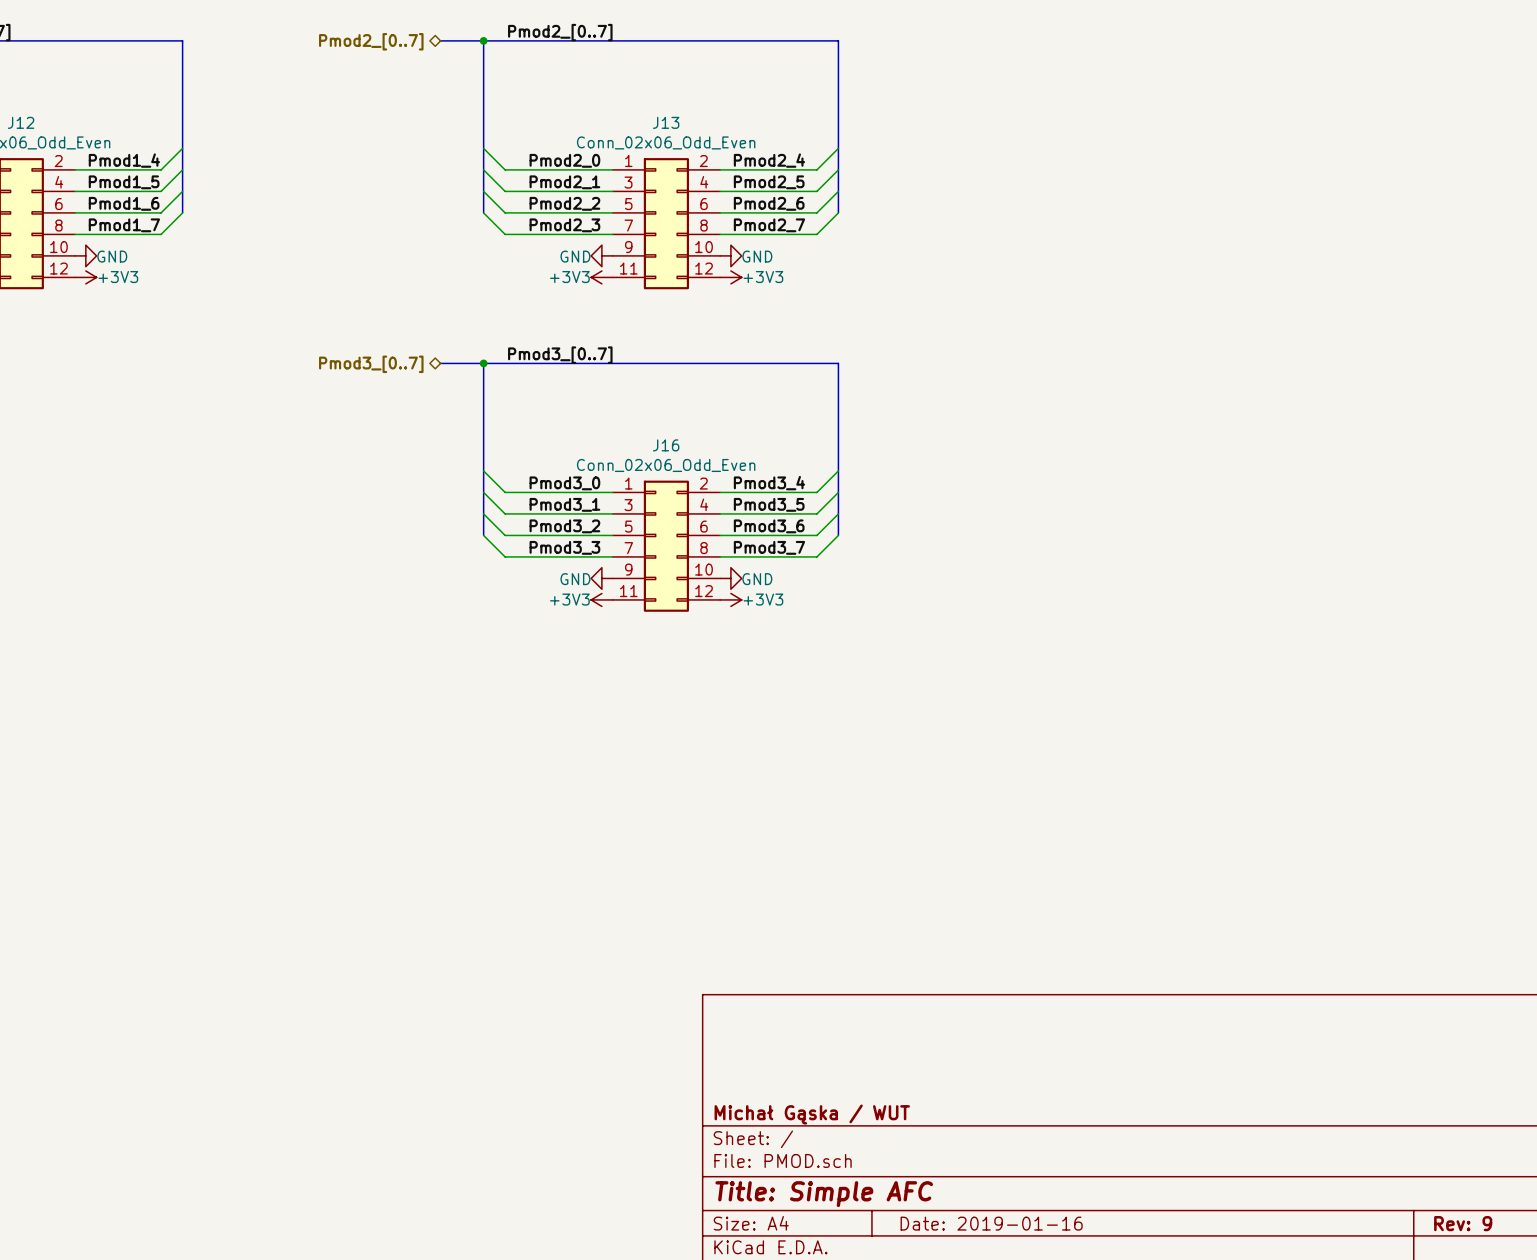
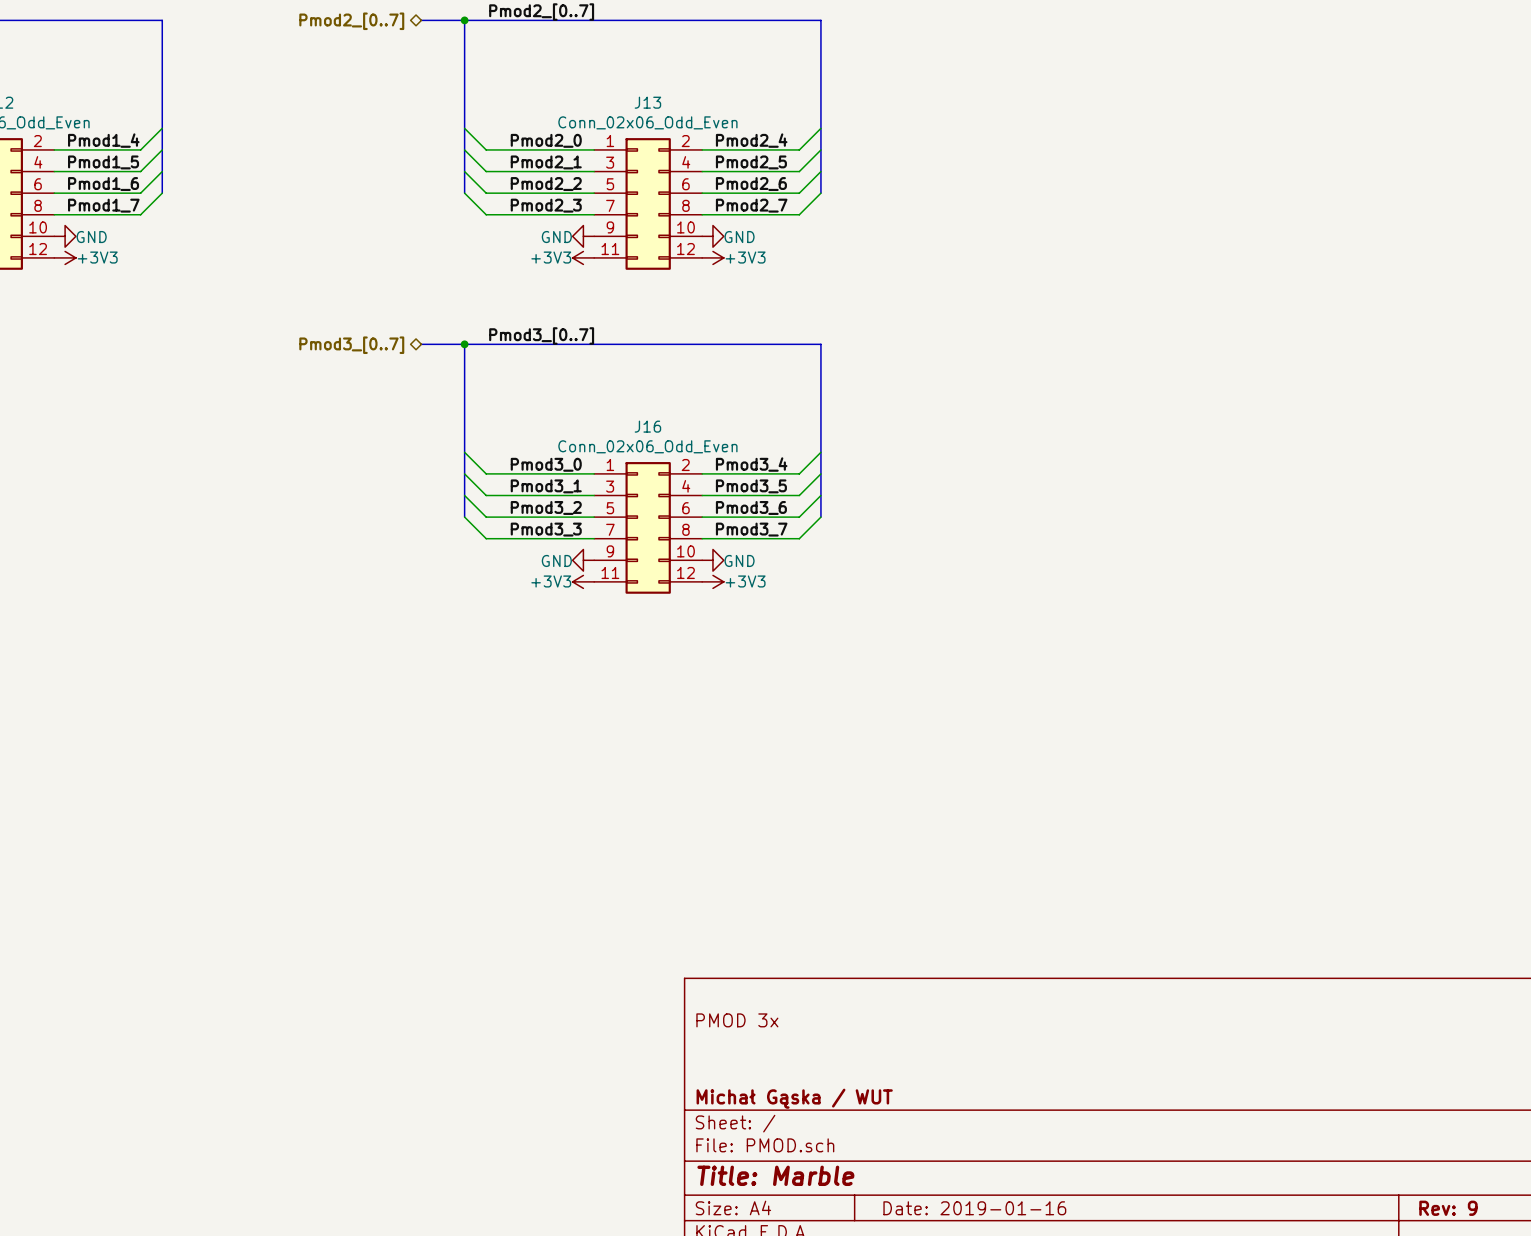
title block: none -> PMOD 3x (737, 1020)
title block: Title: Simple AFC (824, 1194) -> Title: Marble (775, 1175)

